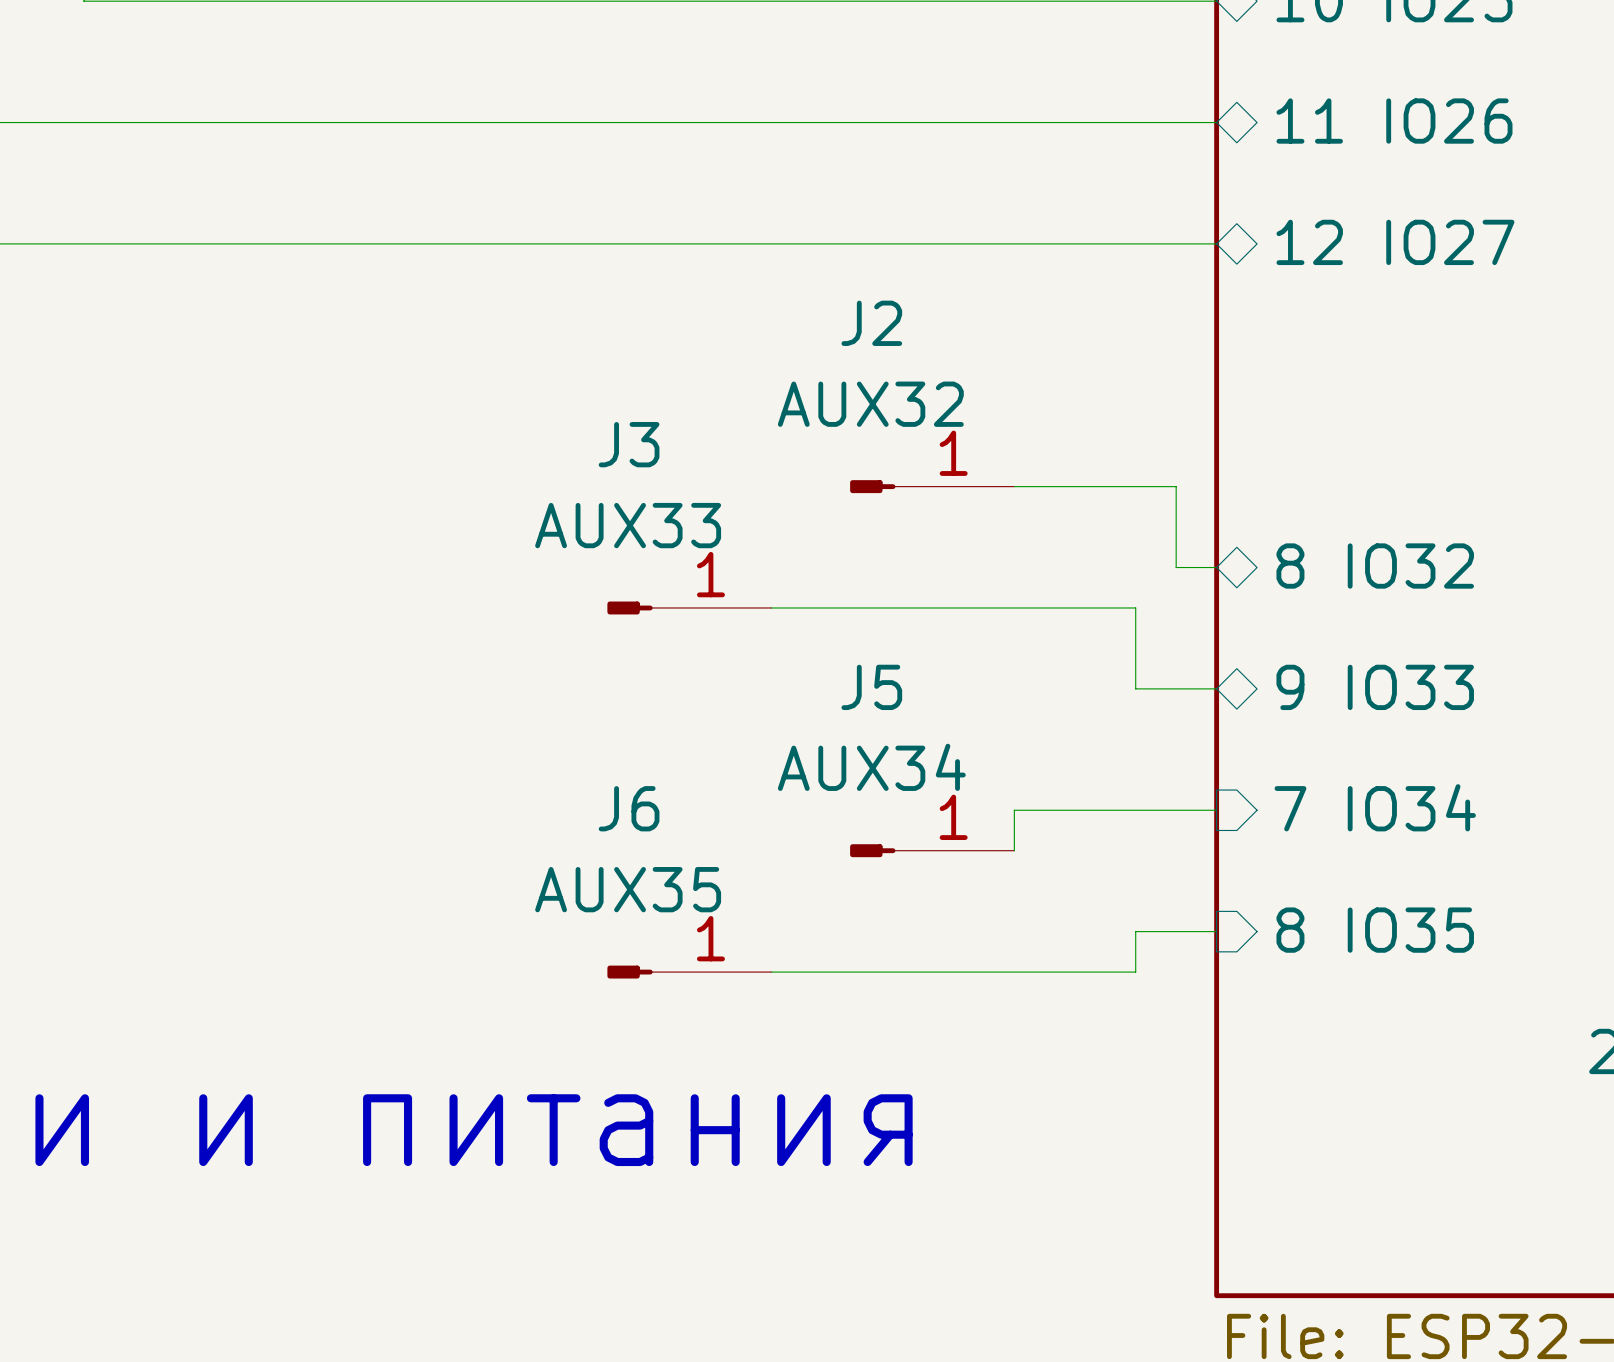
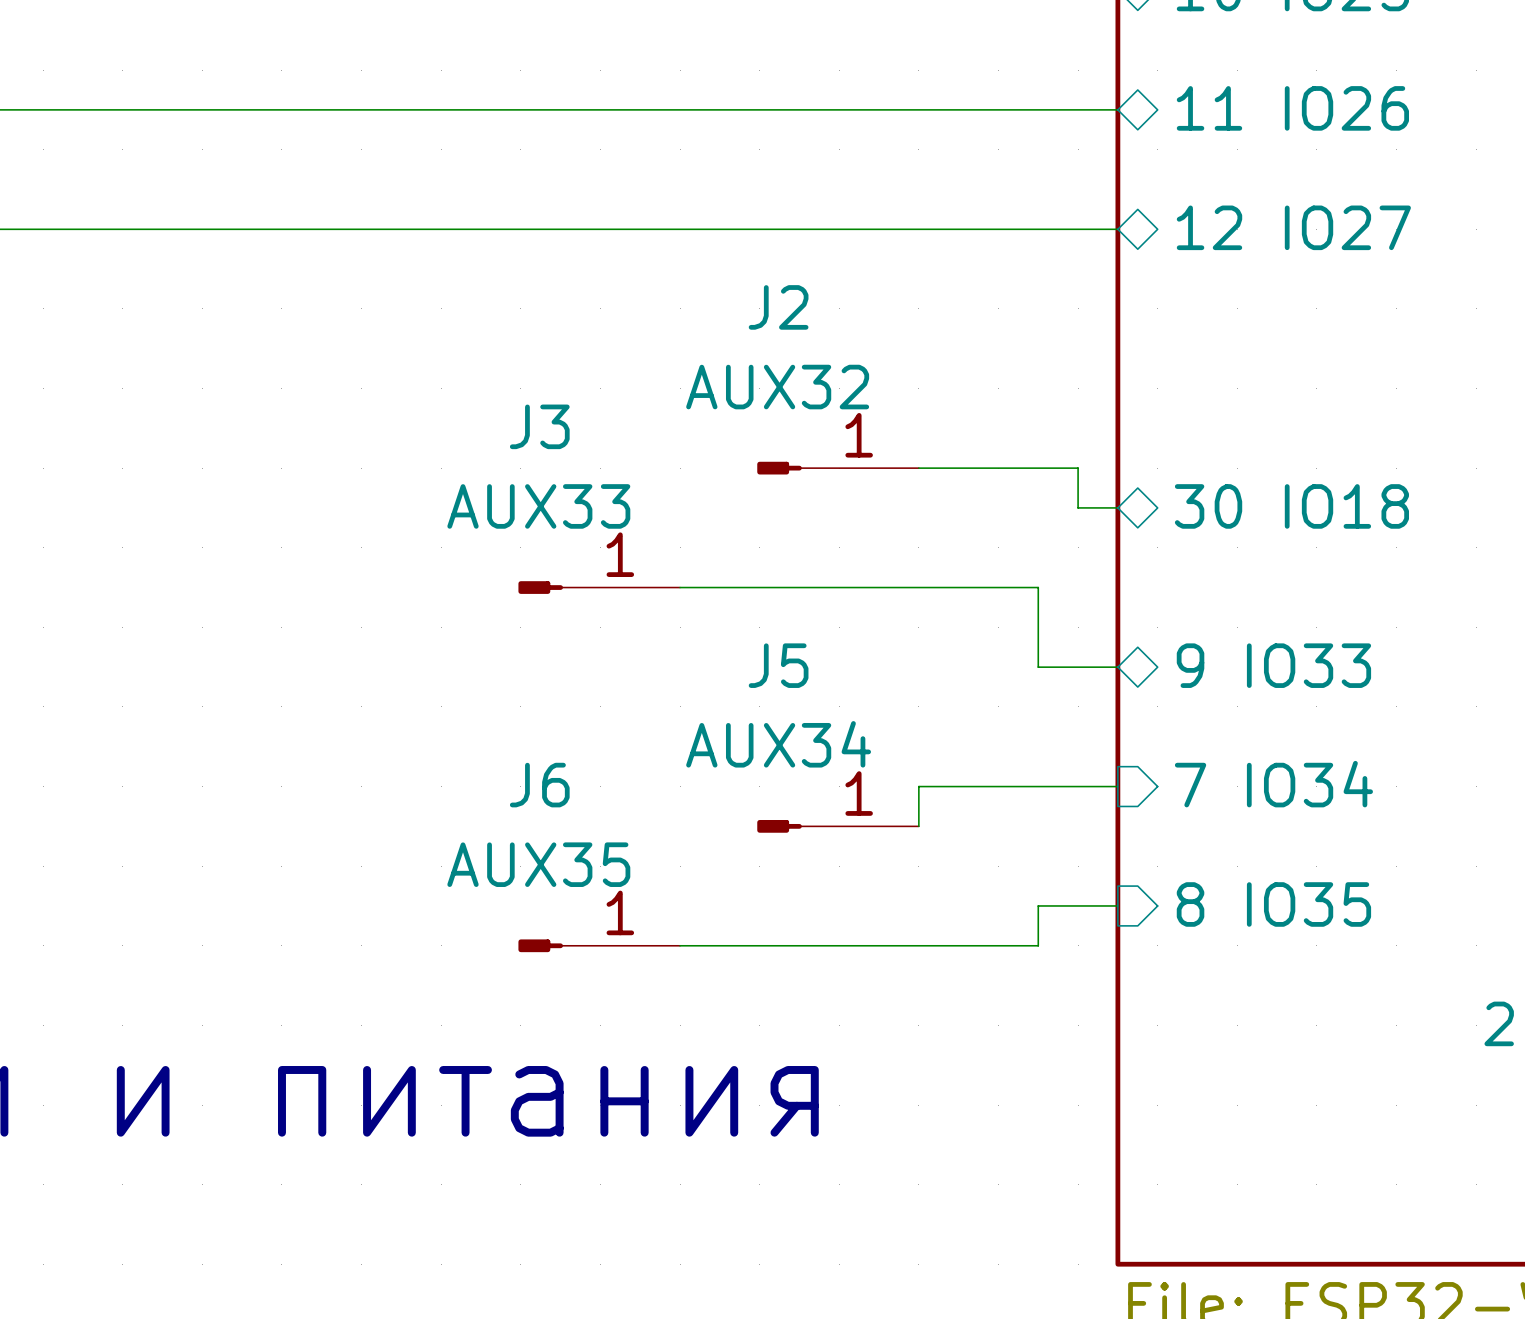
sheet pin: none -> 30 IO18 (1291, 506)
wire: (1176, 527) (1176, 567) (1216, 567) -> (1078, 507) (1117, 507)
sheet pin: 8 IO32 (1375, 566) -> none

